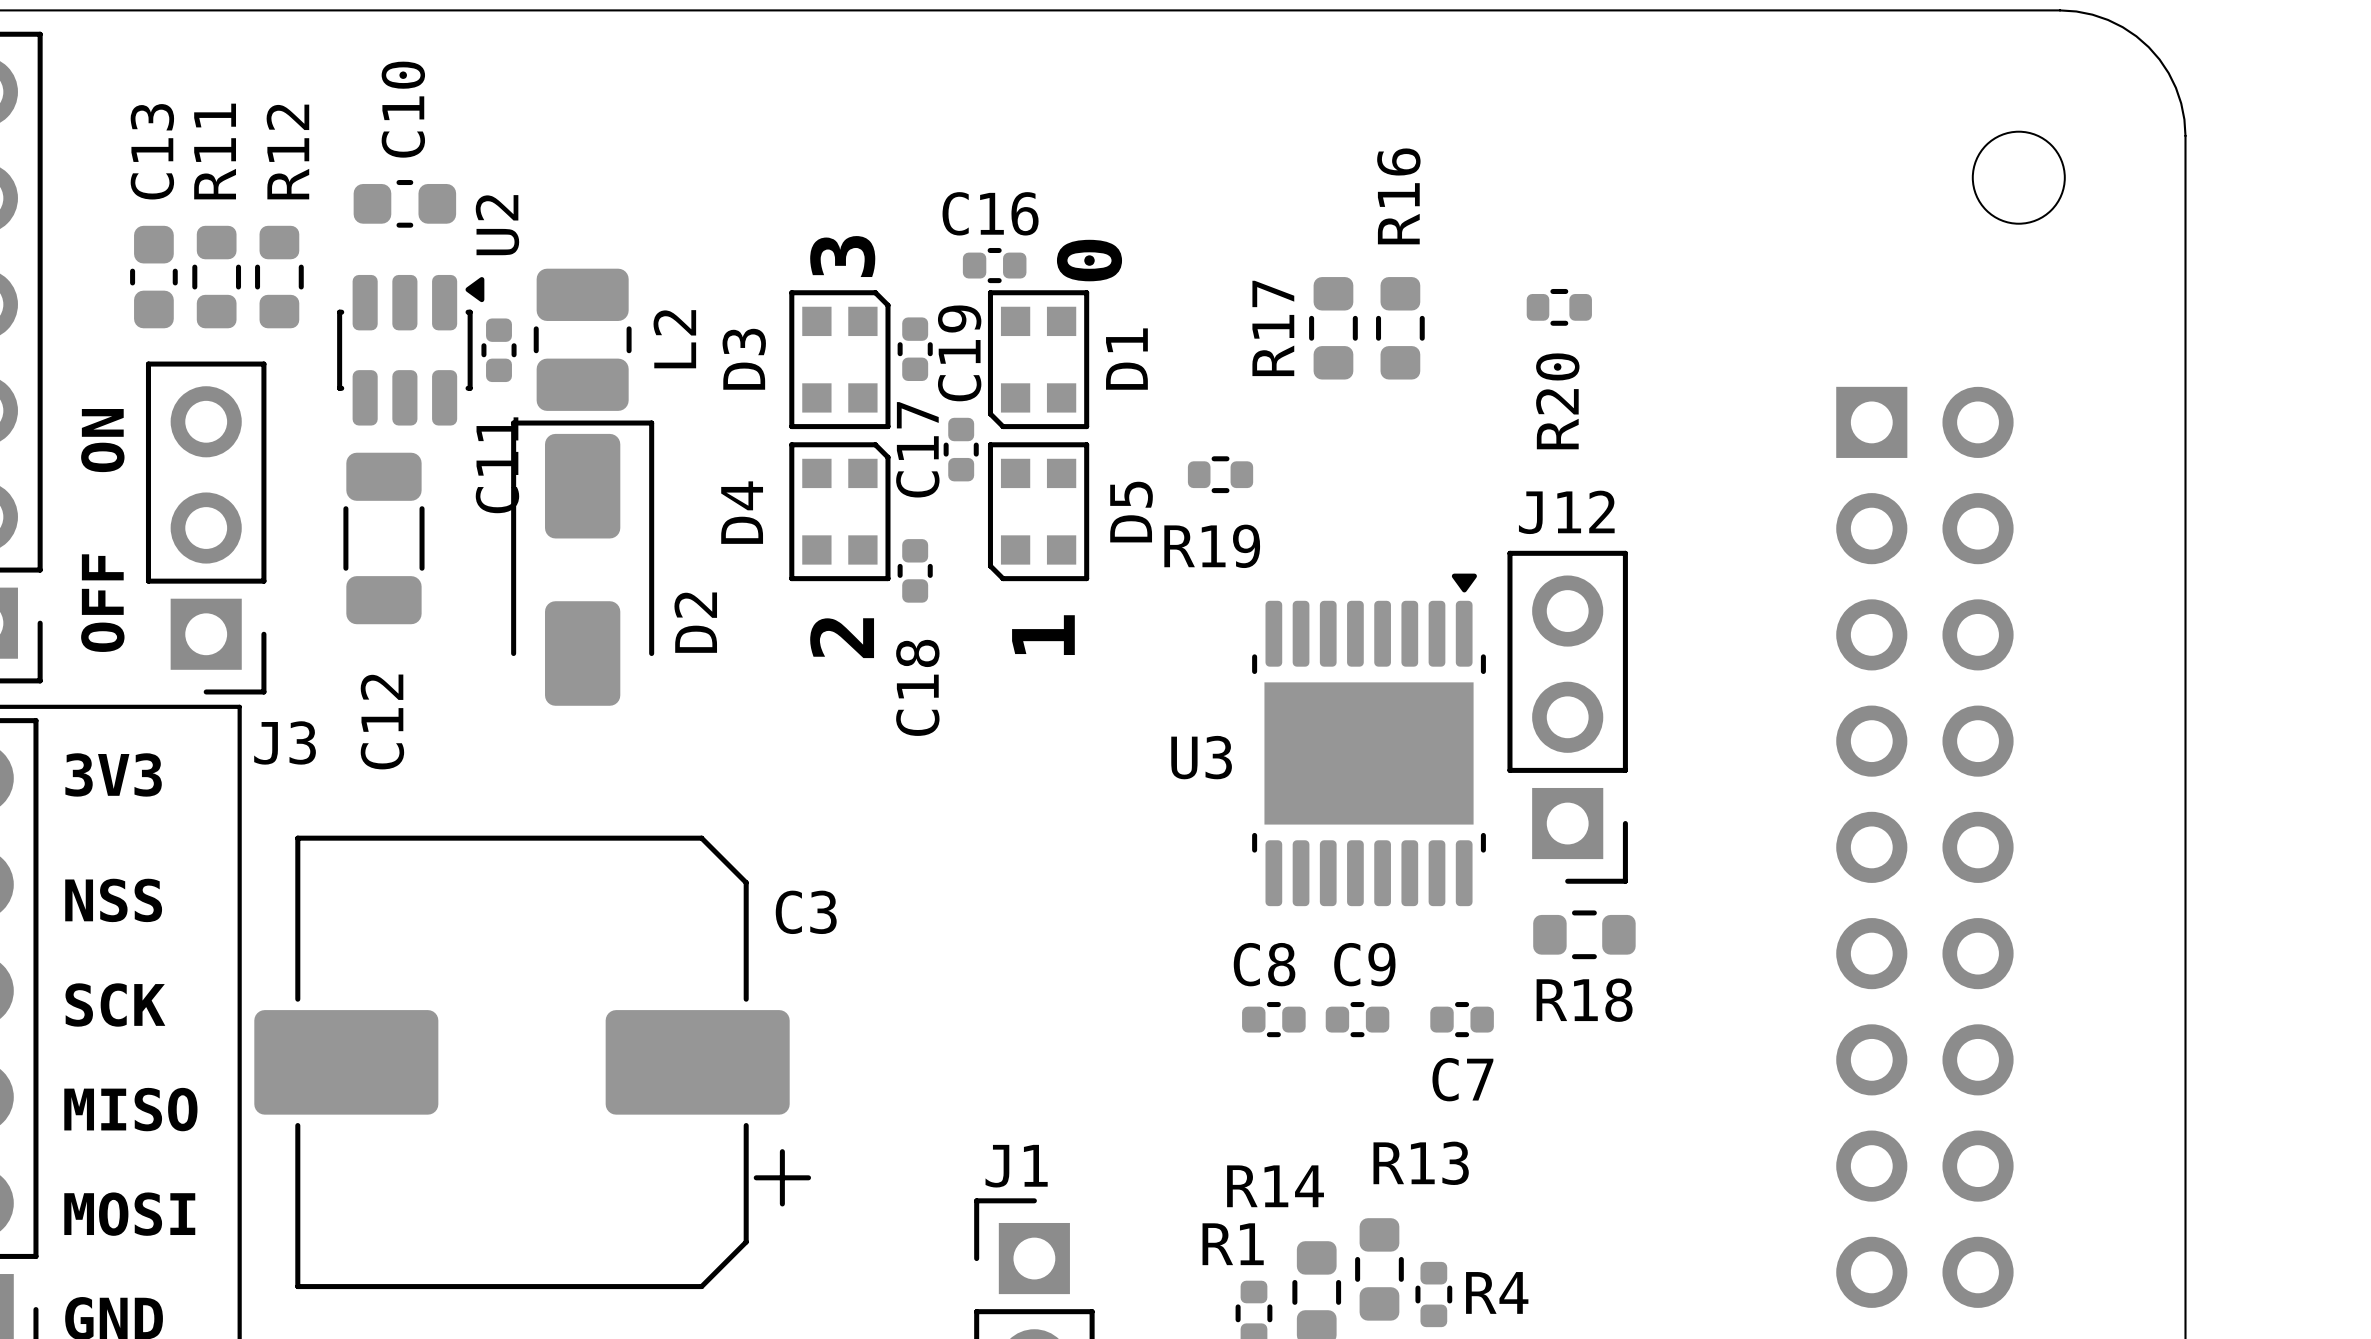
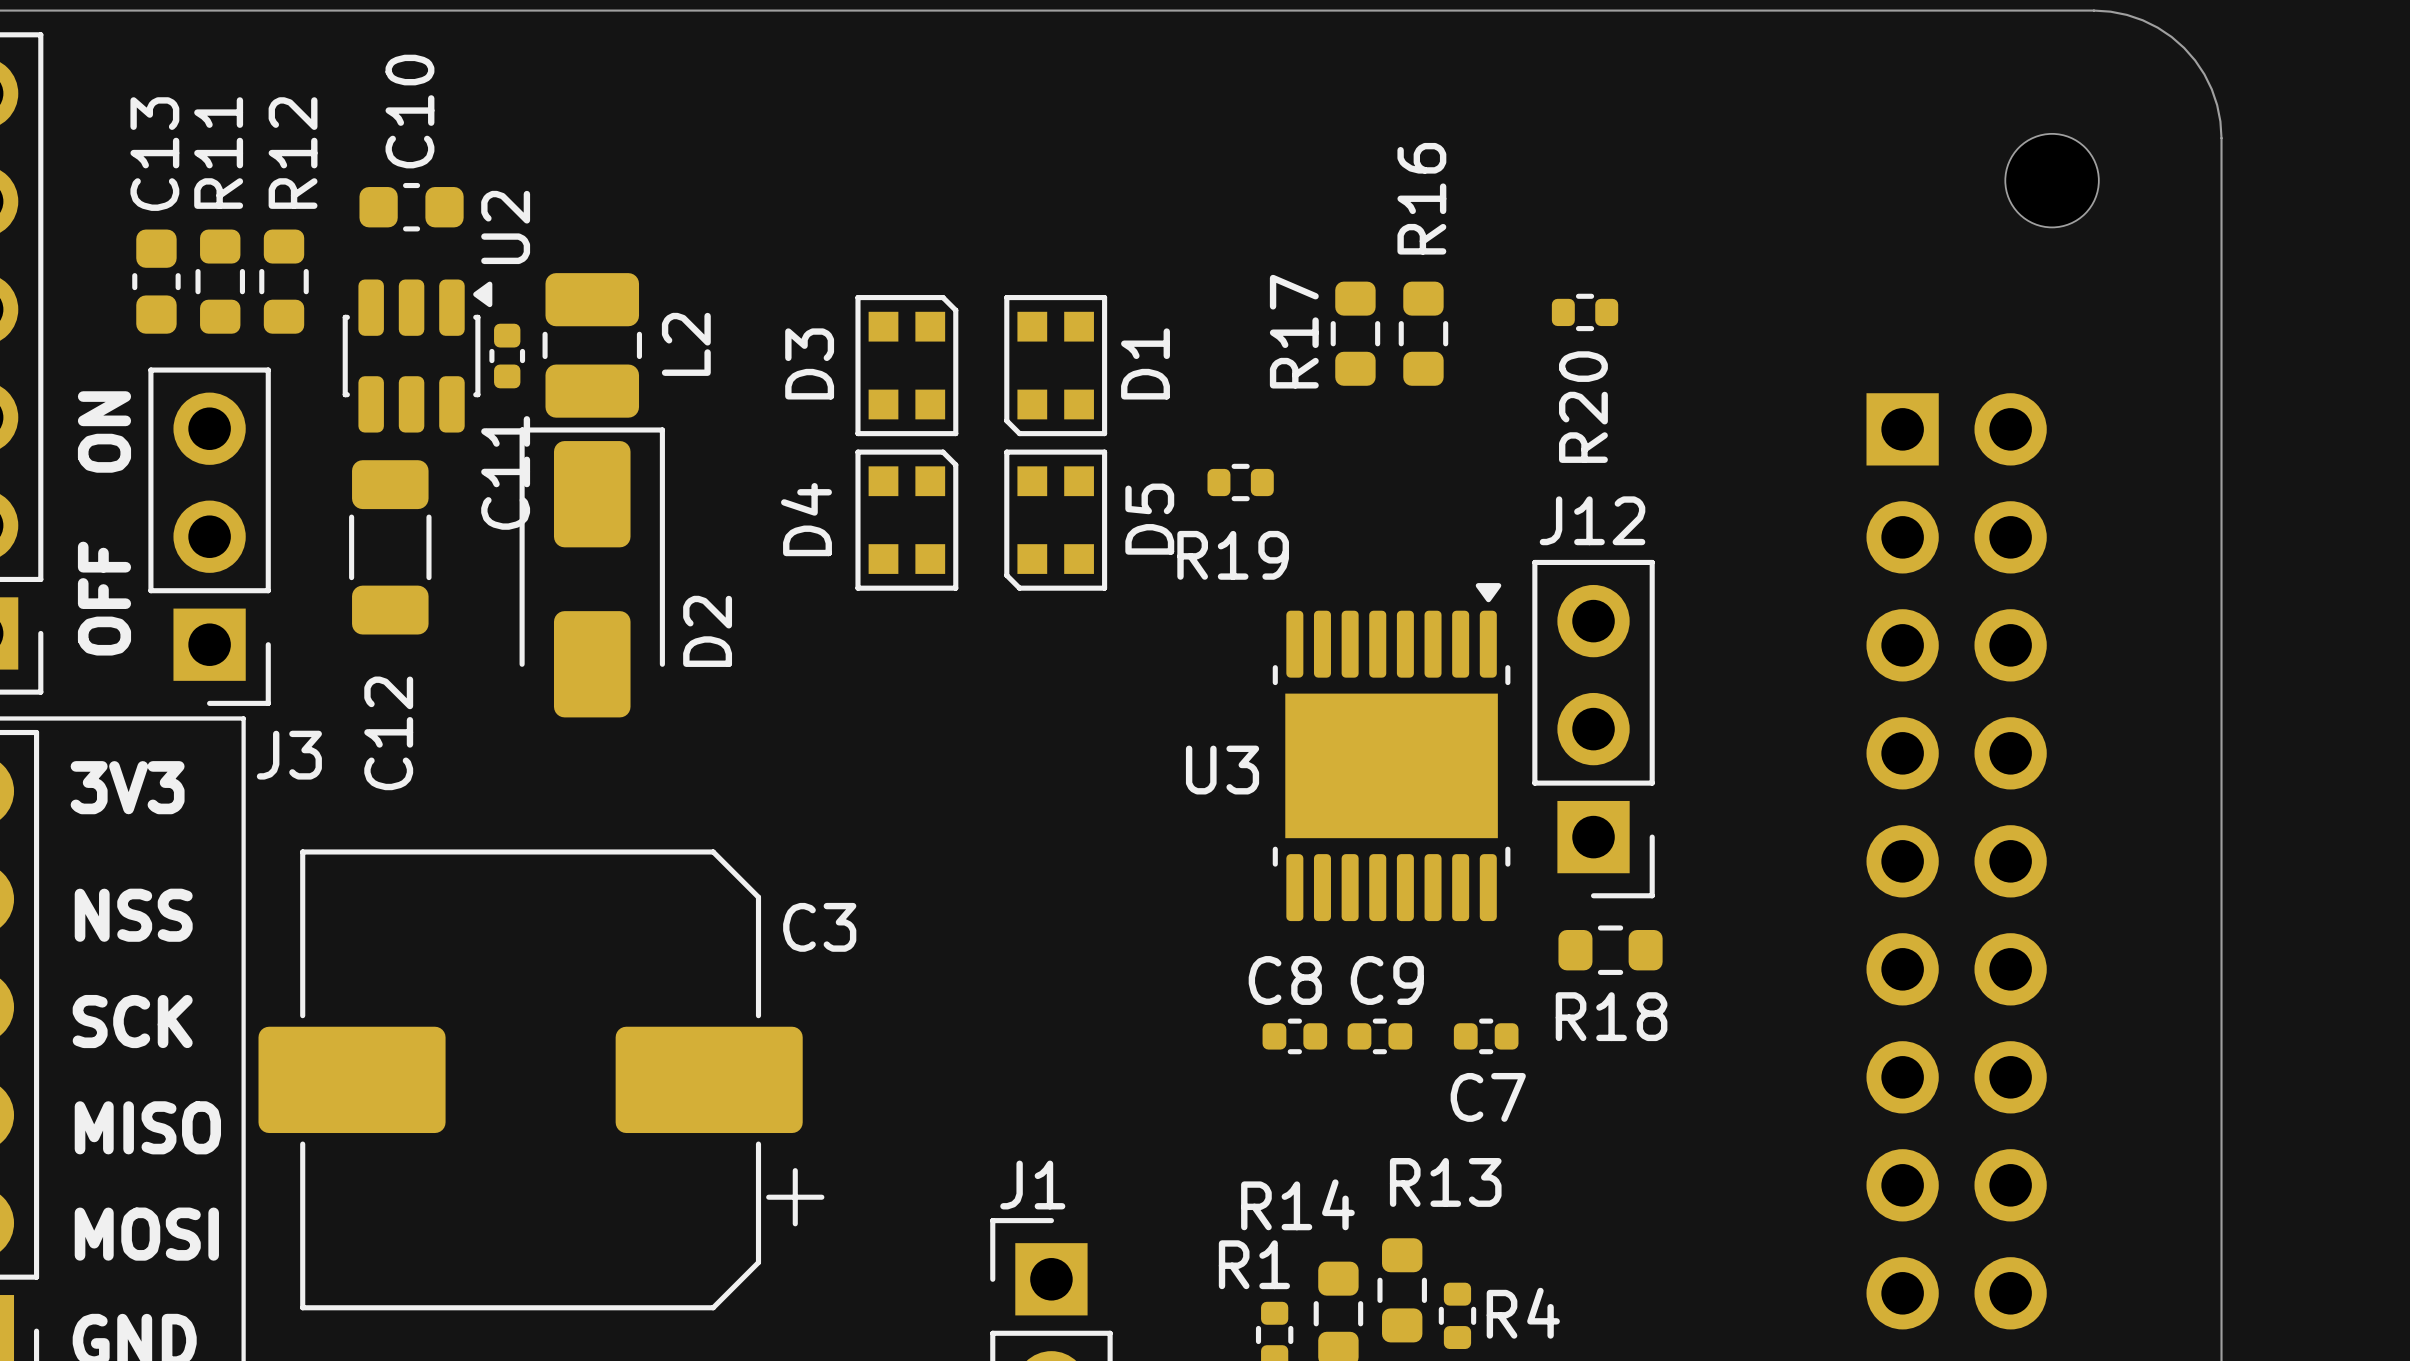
text: 3 (842, 256) -> none
text: 0 (1089, 260) -> none
C16: (994, 265) -> none
C19: (915, 349) -> none
D3 position: (839, 359) -> (906, 365)
C17: (961, 449) -> none
D4 position: (839, 511) -> (906, 520)
C18: (915, 570) -> none
text: 1 (1043, 635) -> none
text: 2 (842, 638) -> none

